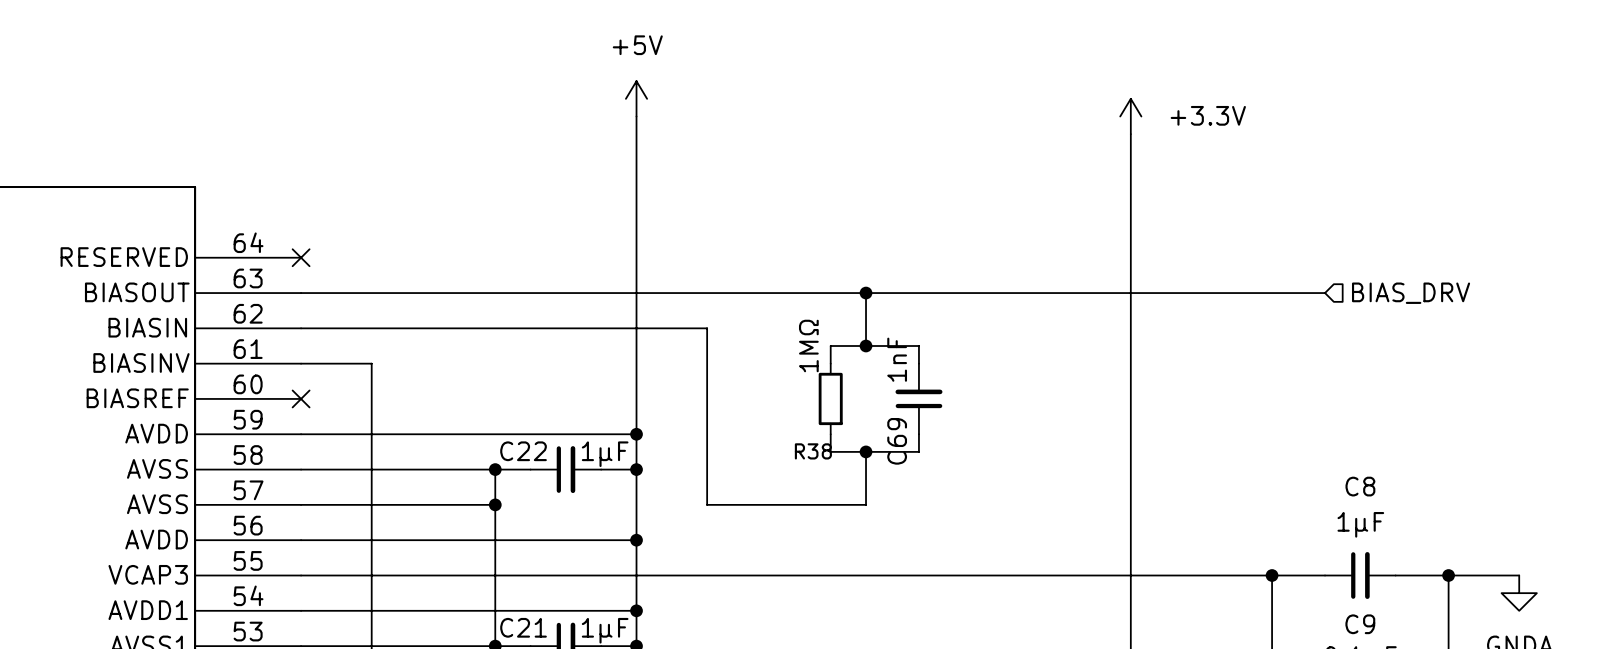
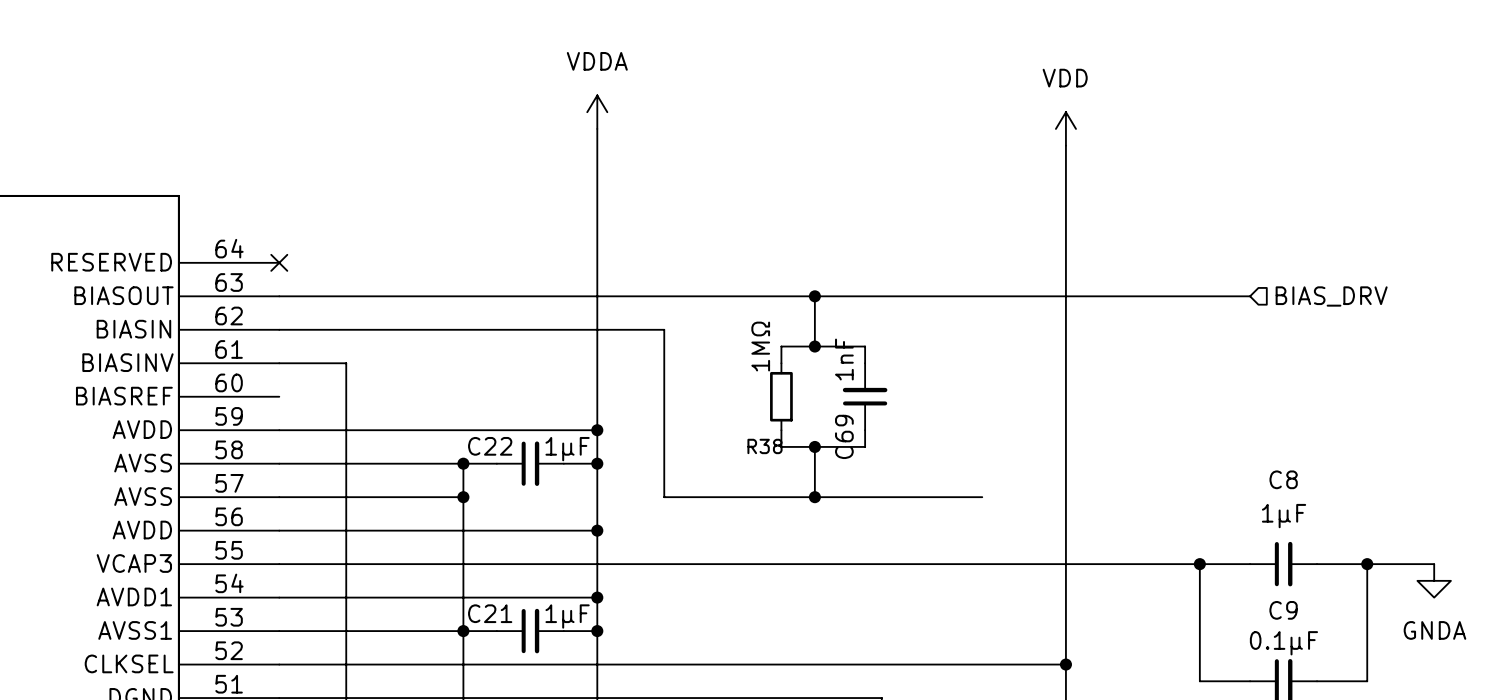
power symbol: +5V (636, 98) -> VDDA (597, 112)
power symbol: +3.3V (1130, 116) -> VDD (1065, 128)
no-connect mark: (301, 398) -> none
wire: none -> (814, 497) (982, 497)
junction: none -> (814, 497)

